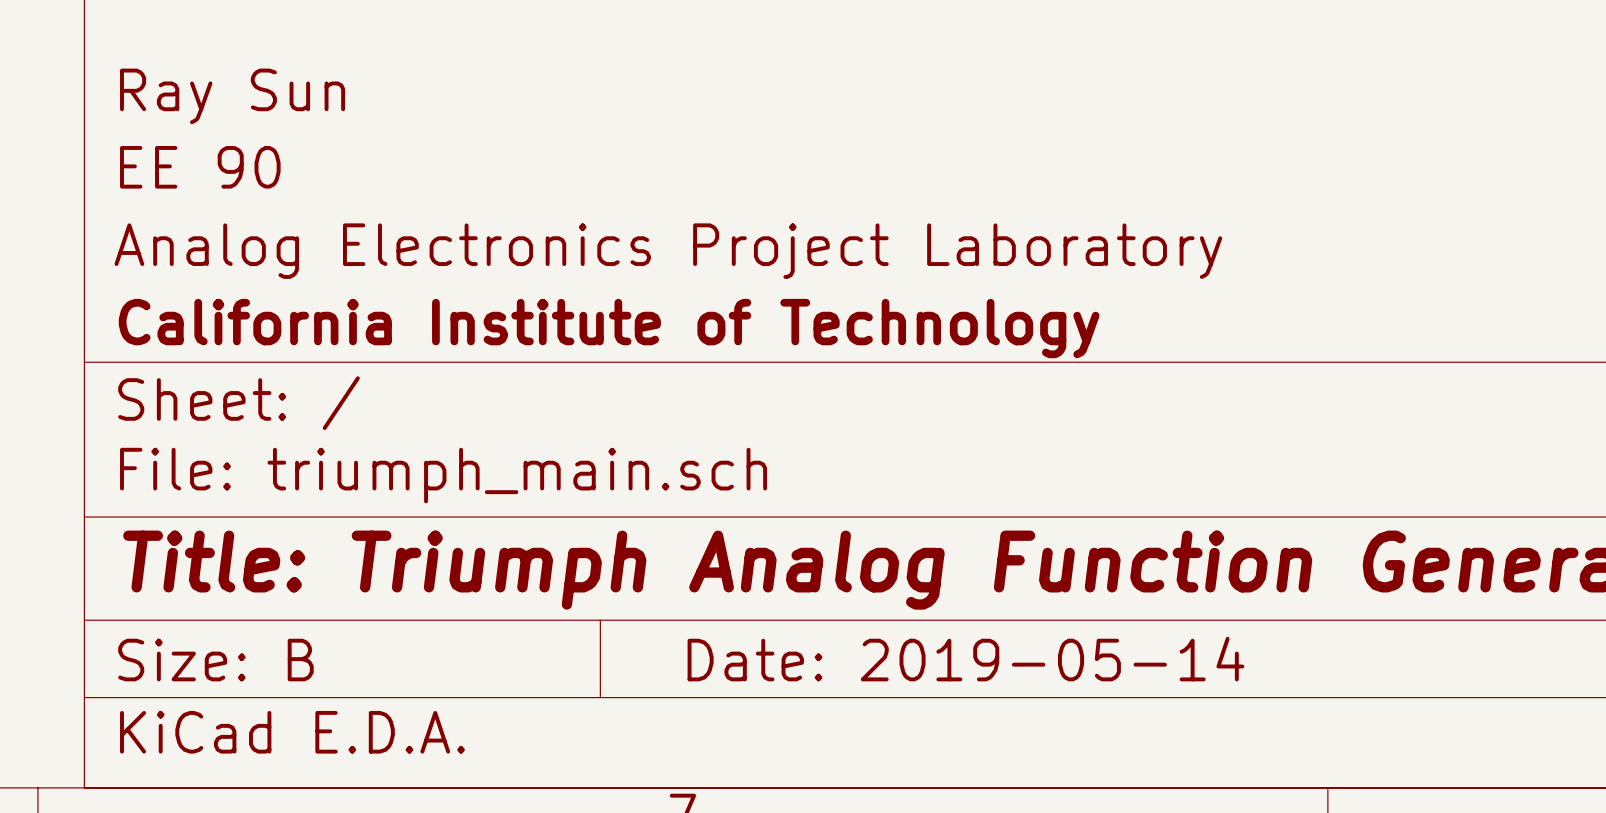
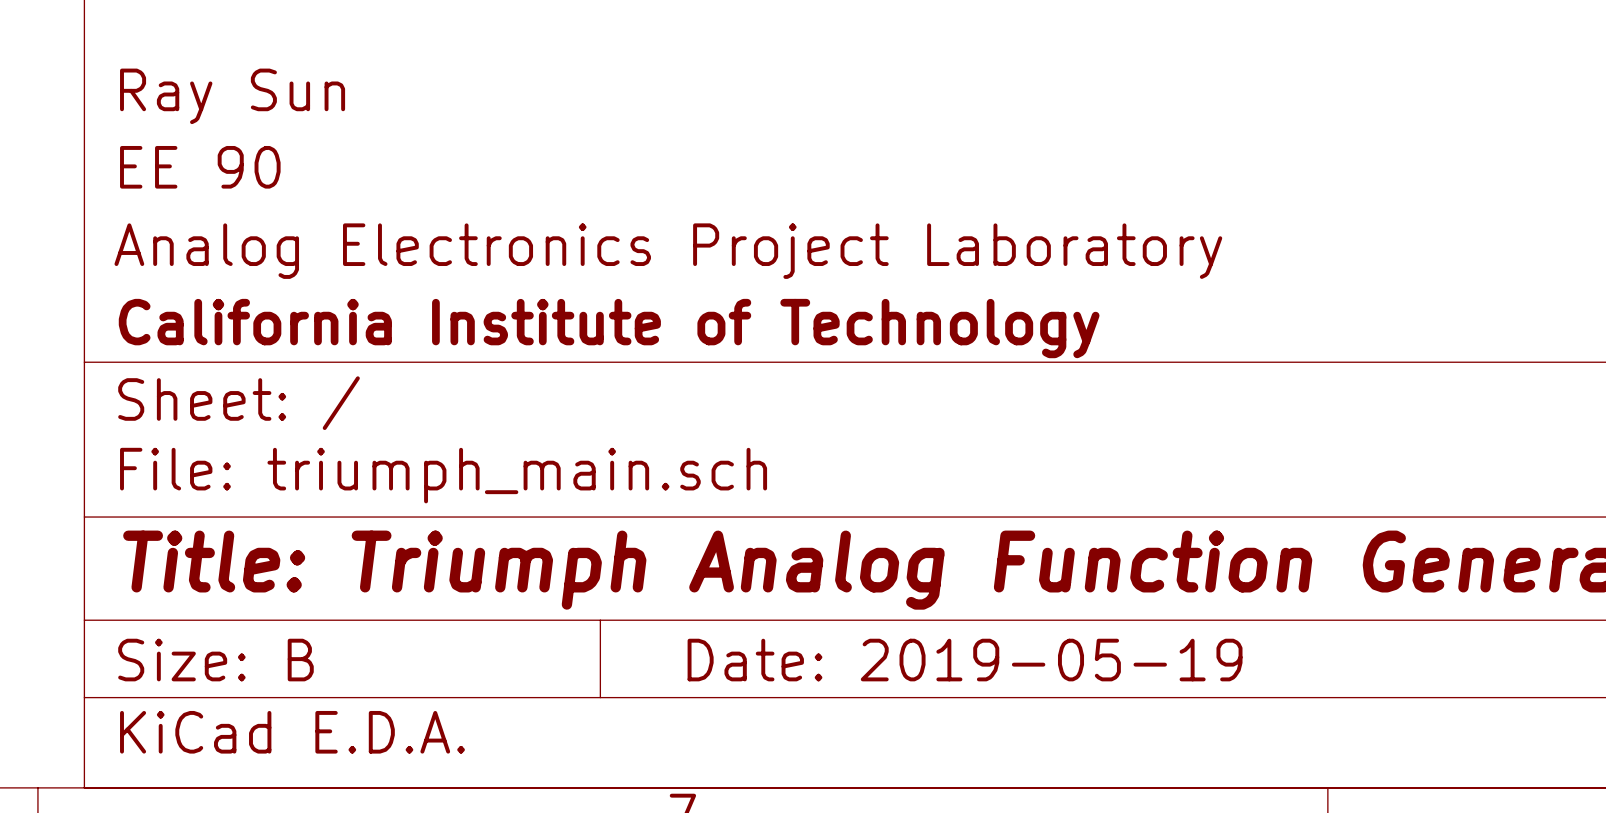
title block: Date: 2019-05-14 (965, 659) -> Date: 2019-05-19 (965, 660)

